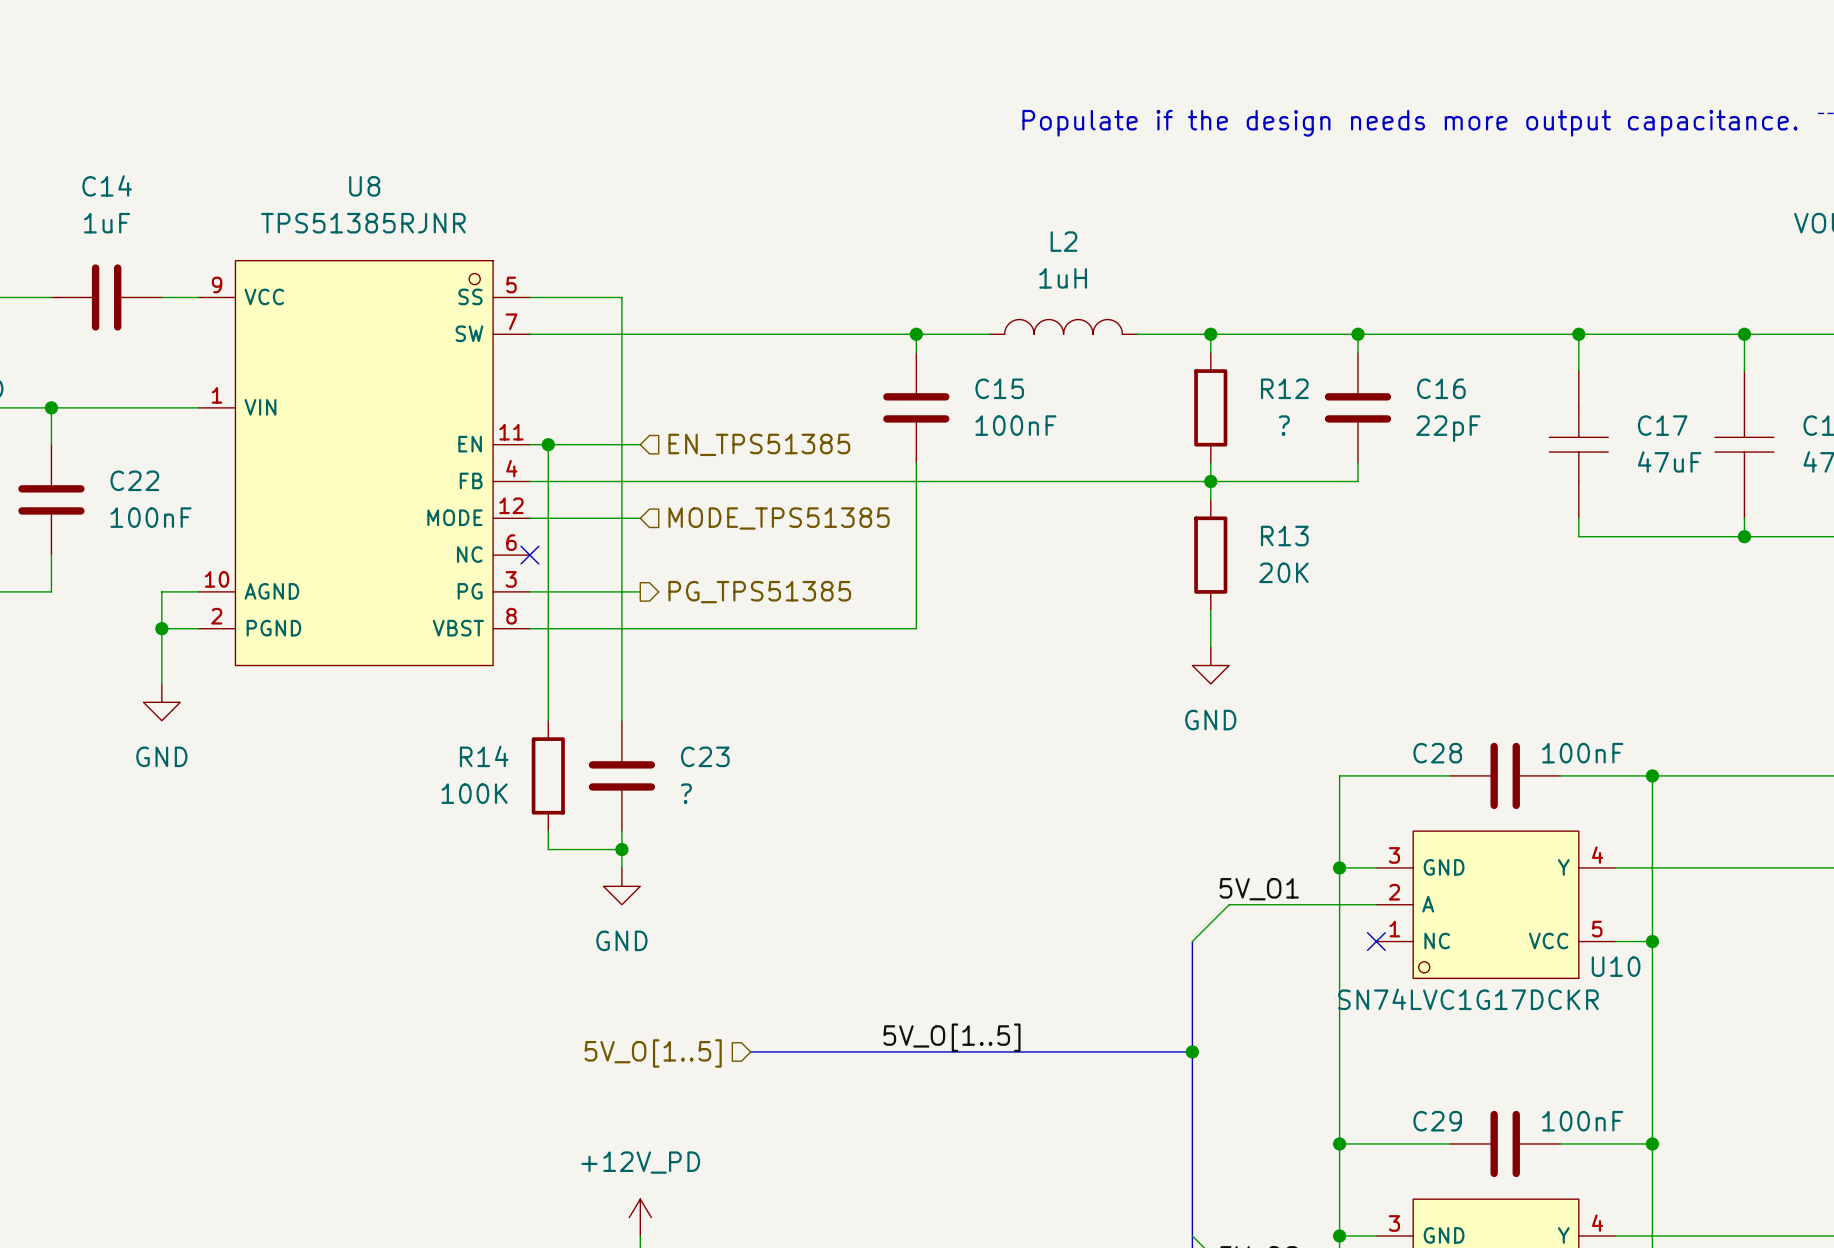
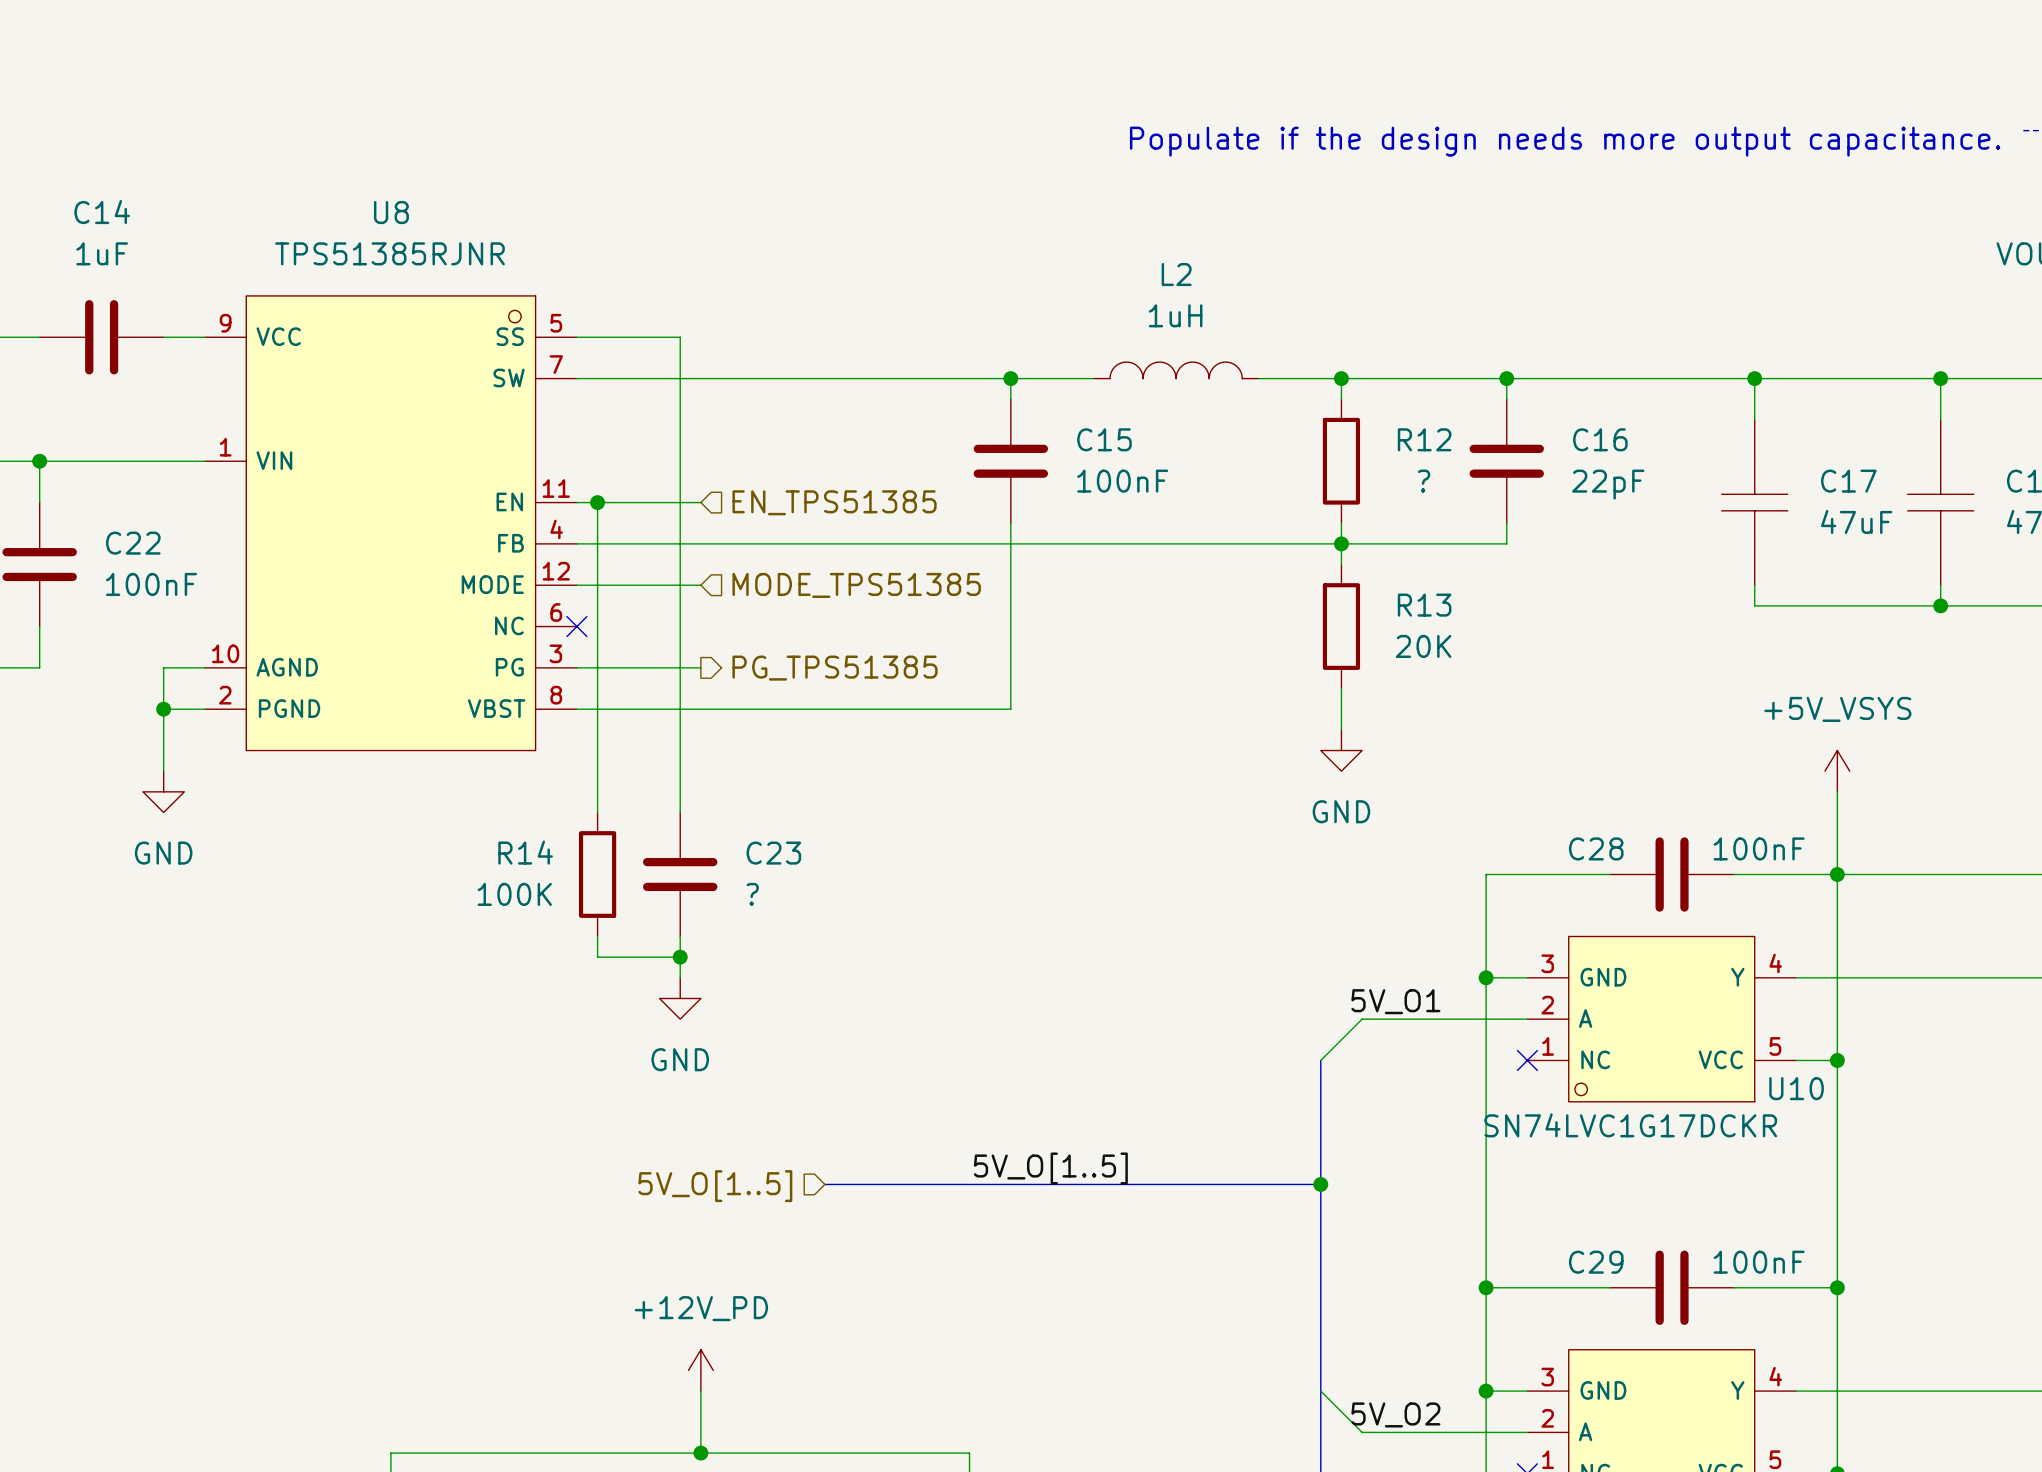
power symbol: none -> +5V_VSYS (1837, 771)
wire: none -> (1837, 791) (1837, 874)

